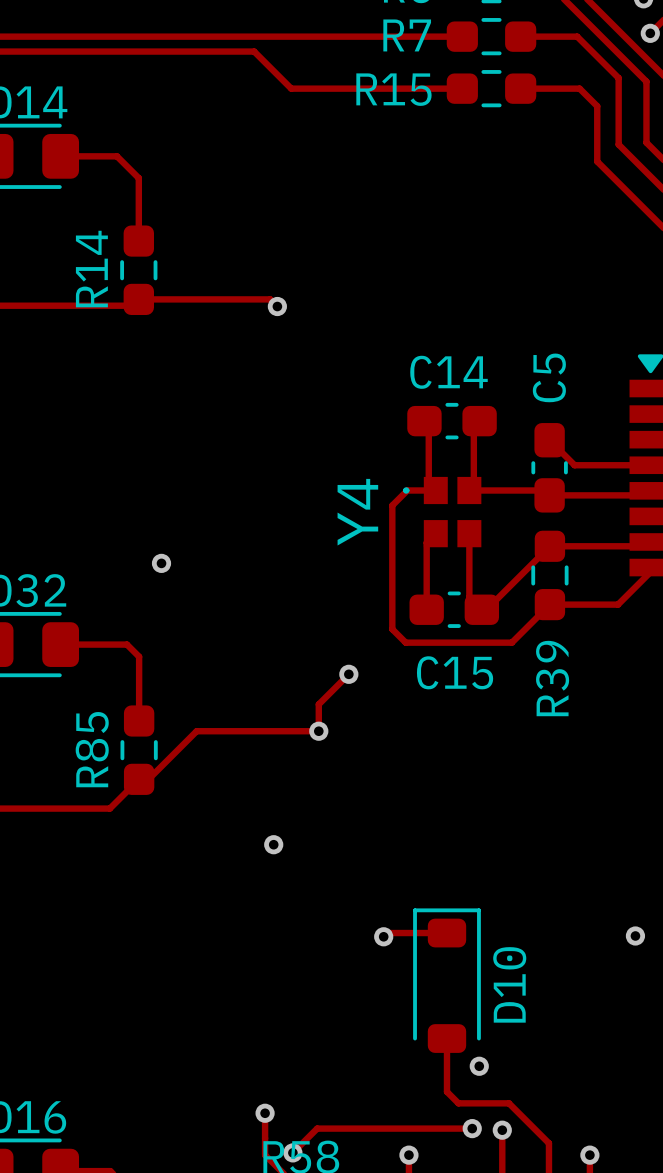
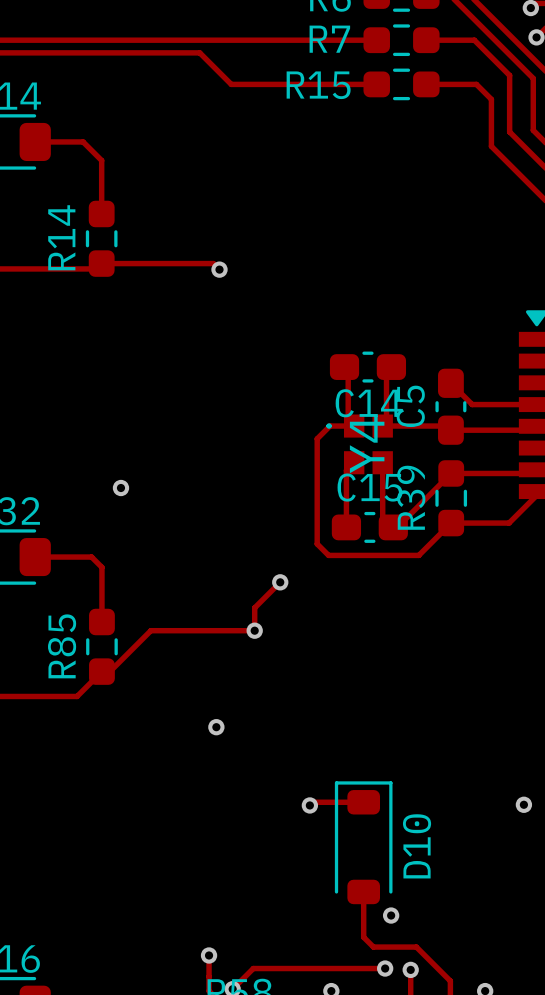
C14 name position: C14 (449, 372) -> C14 (368, 403)
C5 name position: C5 (549, 377) -> C5 (410, 406)
Y4 name position: Y4 (357, 512) -> Y4 (367, 444)
C15 name position: C15 (455, 672) -> C15 (369, 487)
R39 name position: R39 (552, 678) -> R39 (411, 497)

